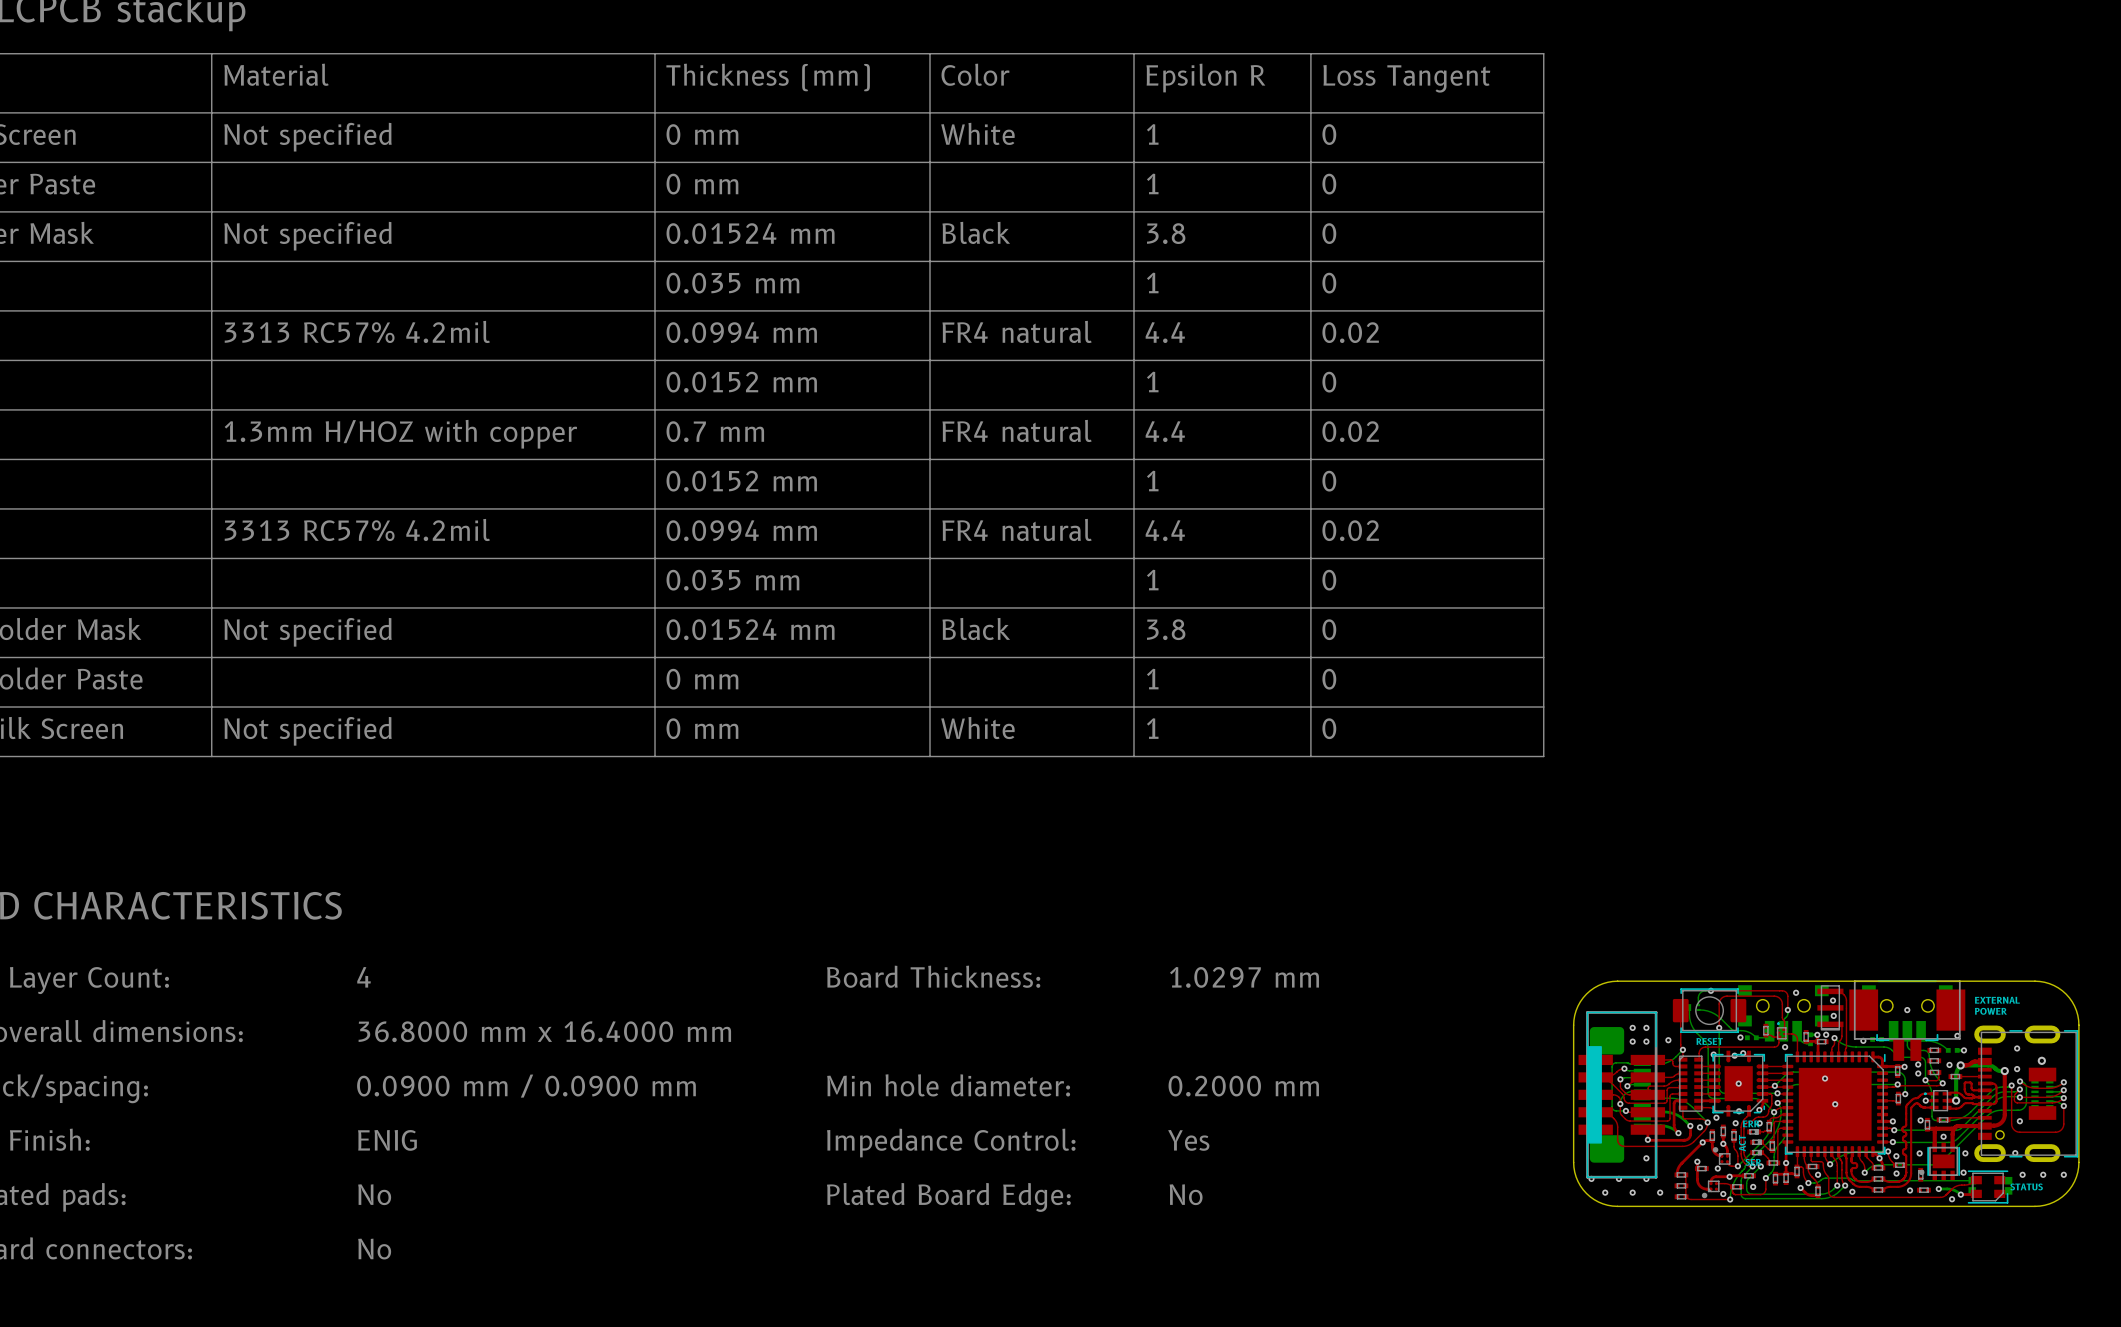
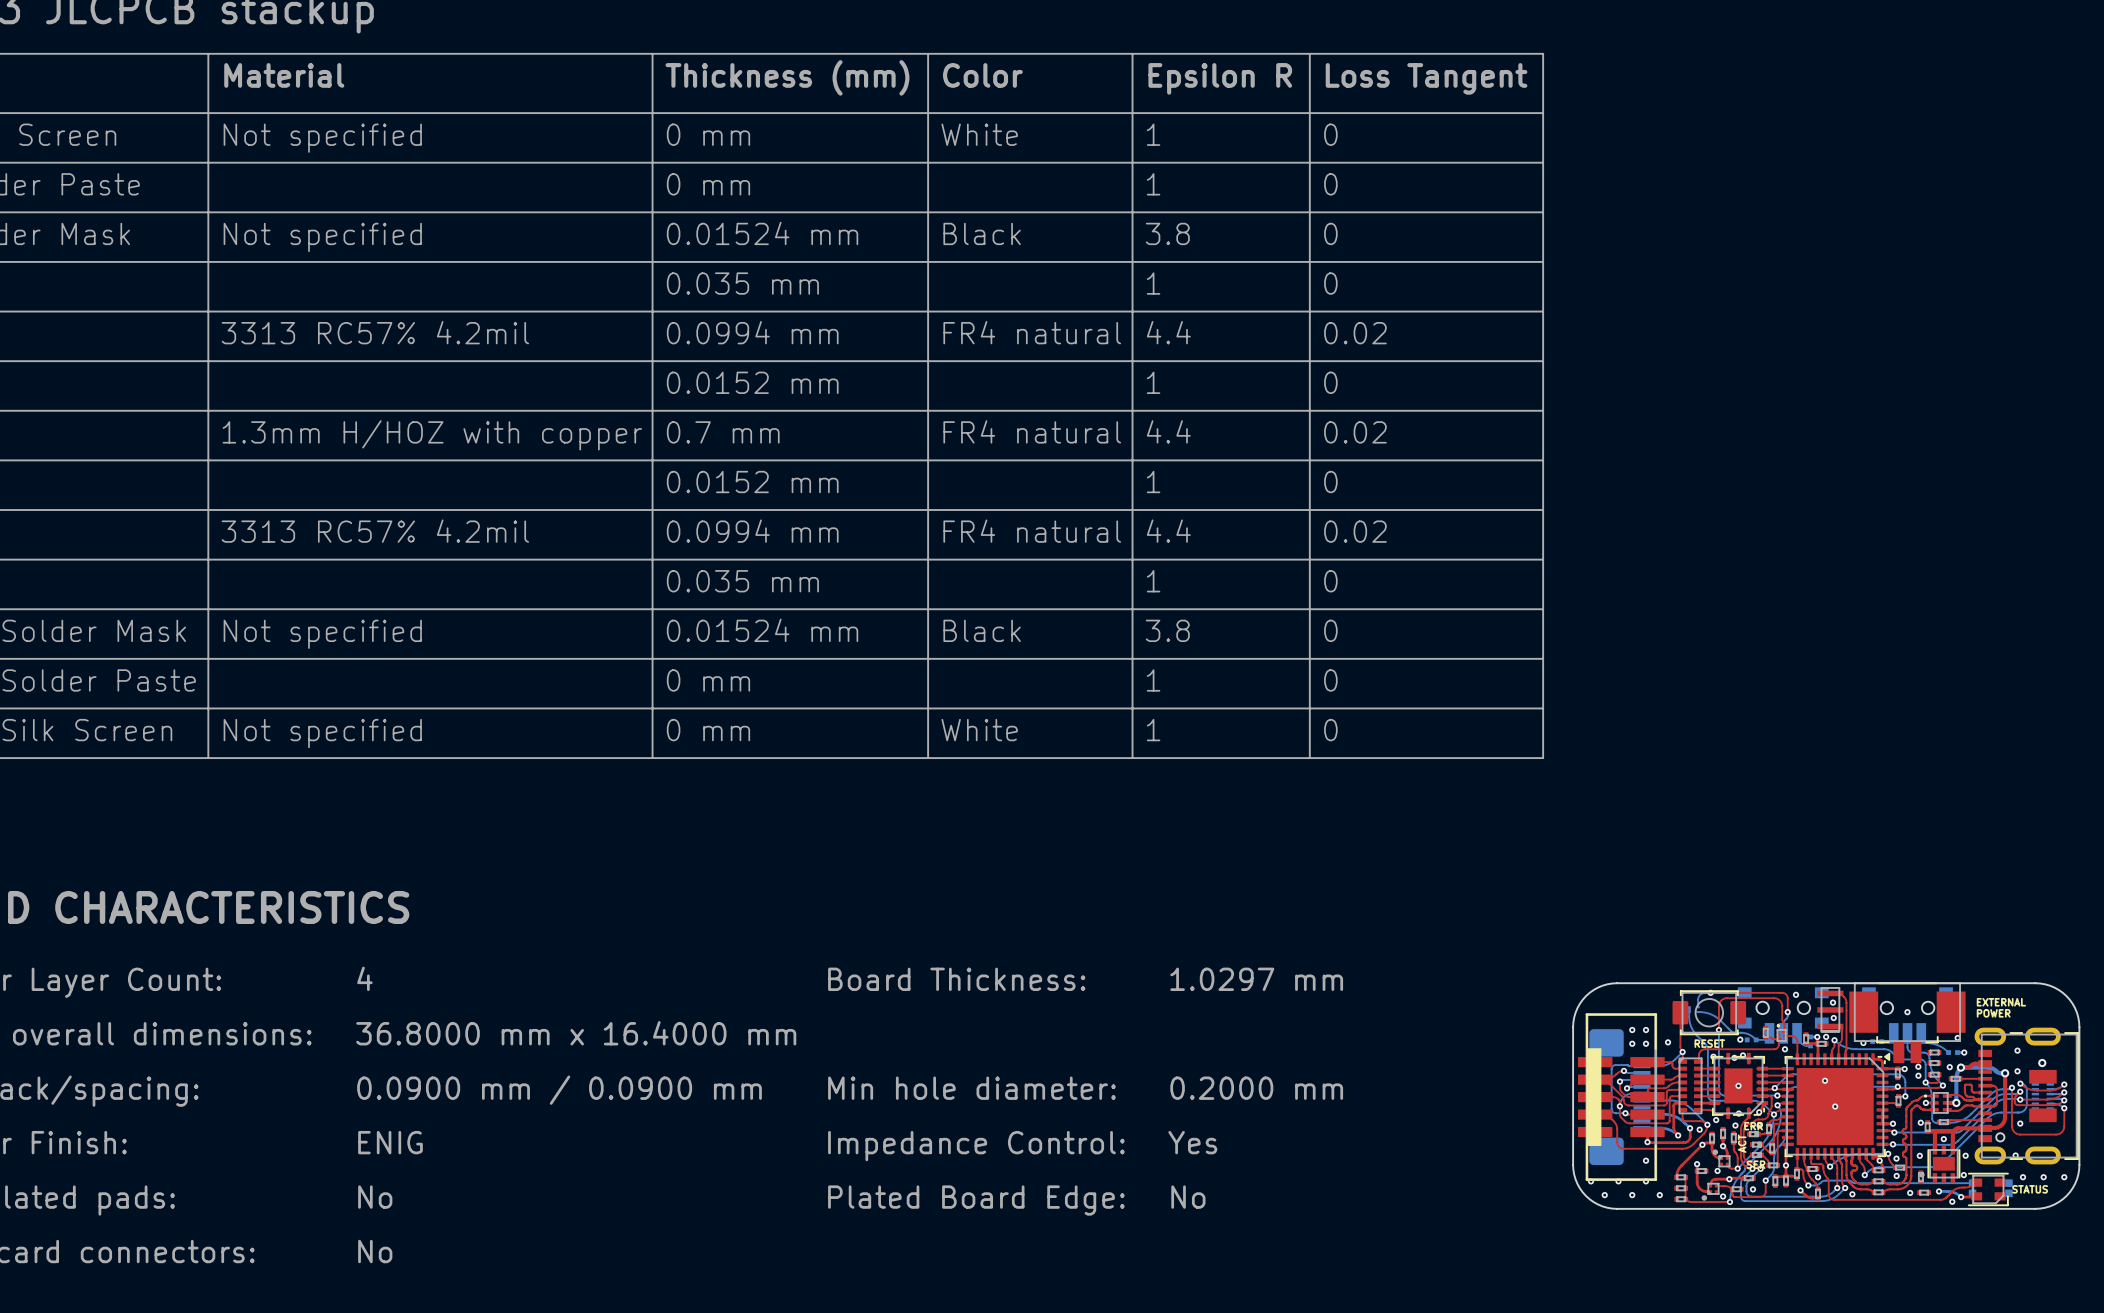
part footprint: [1782, 1051, 1889, 1158] -> [1781, 1052, 1891, 1160]

